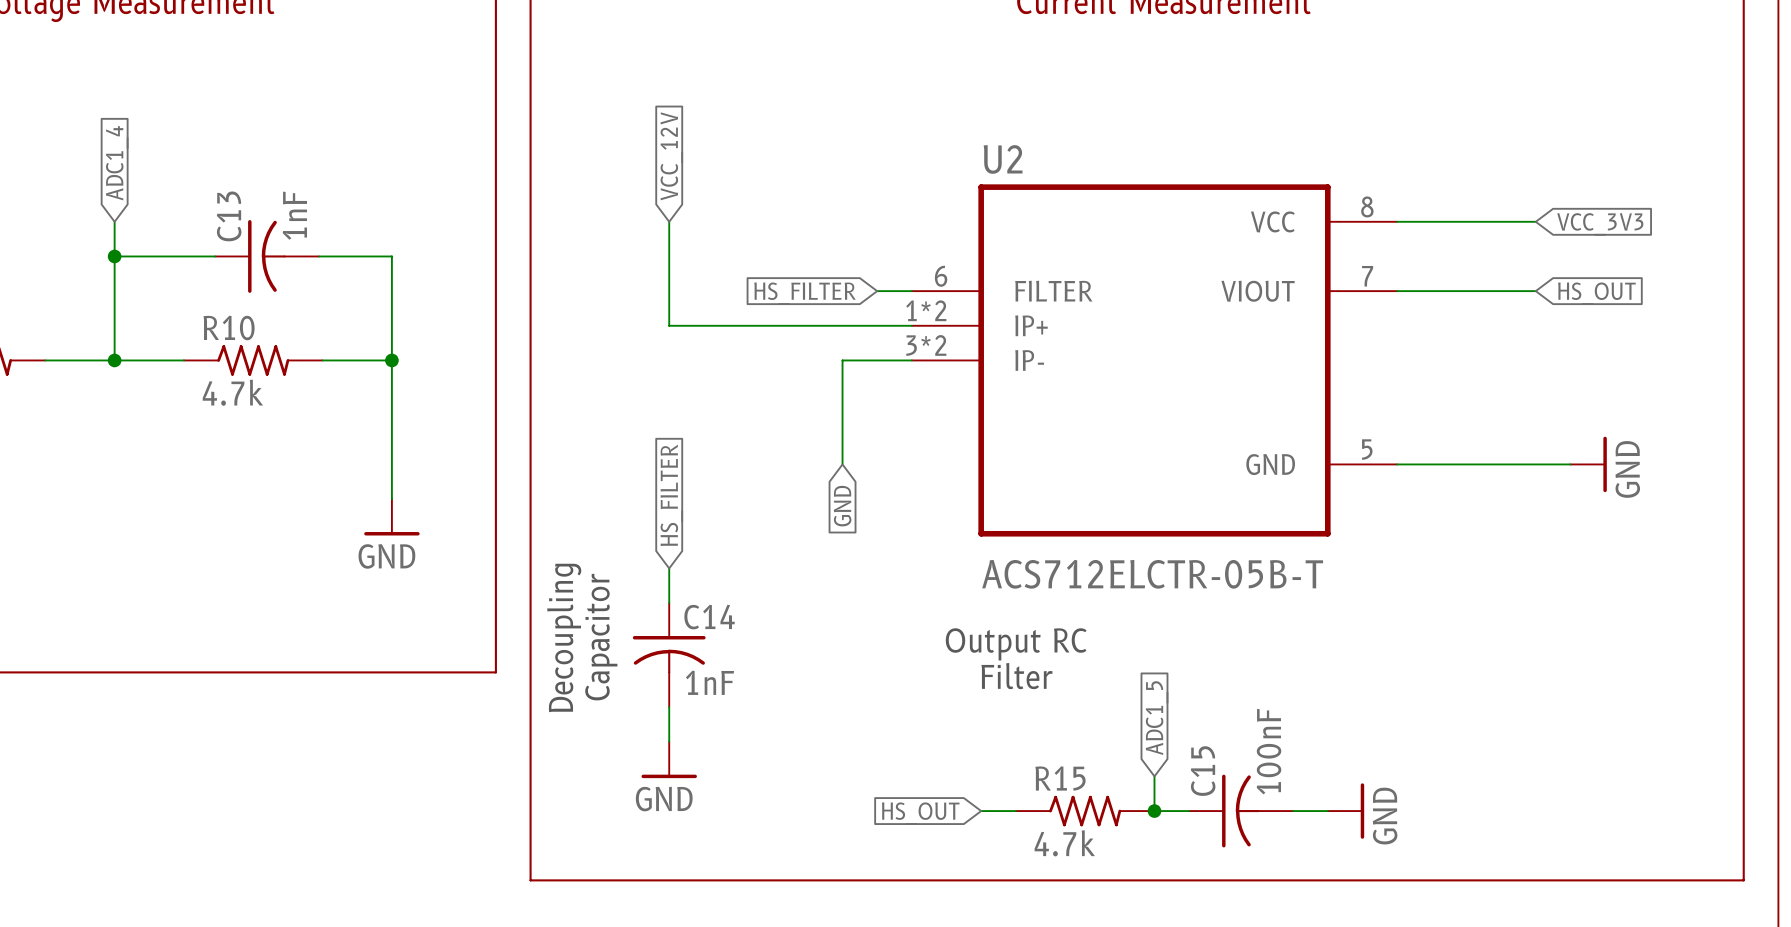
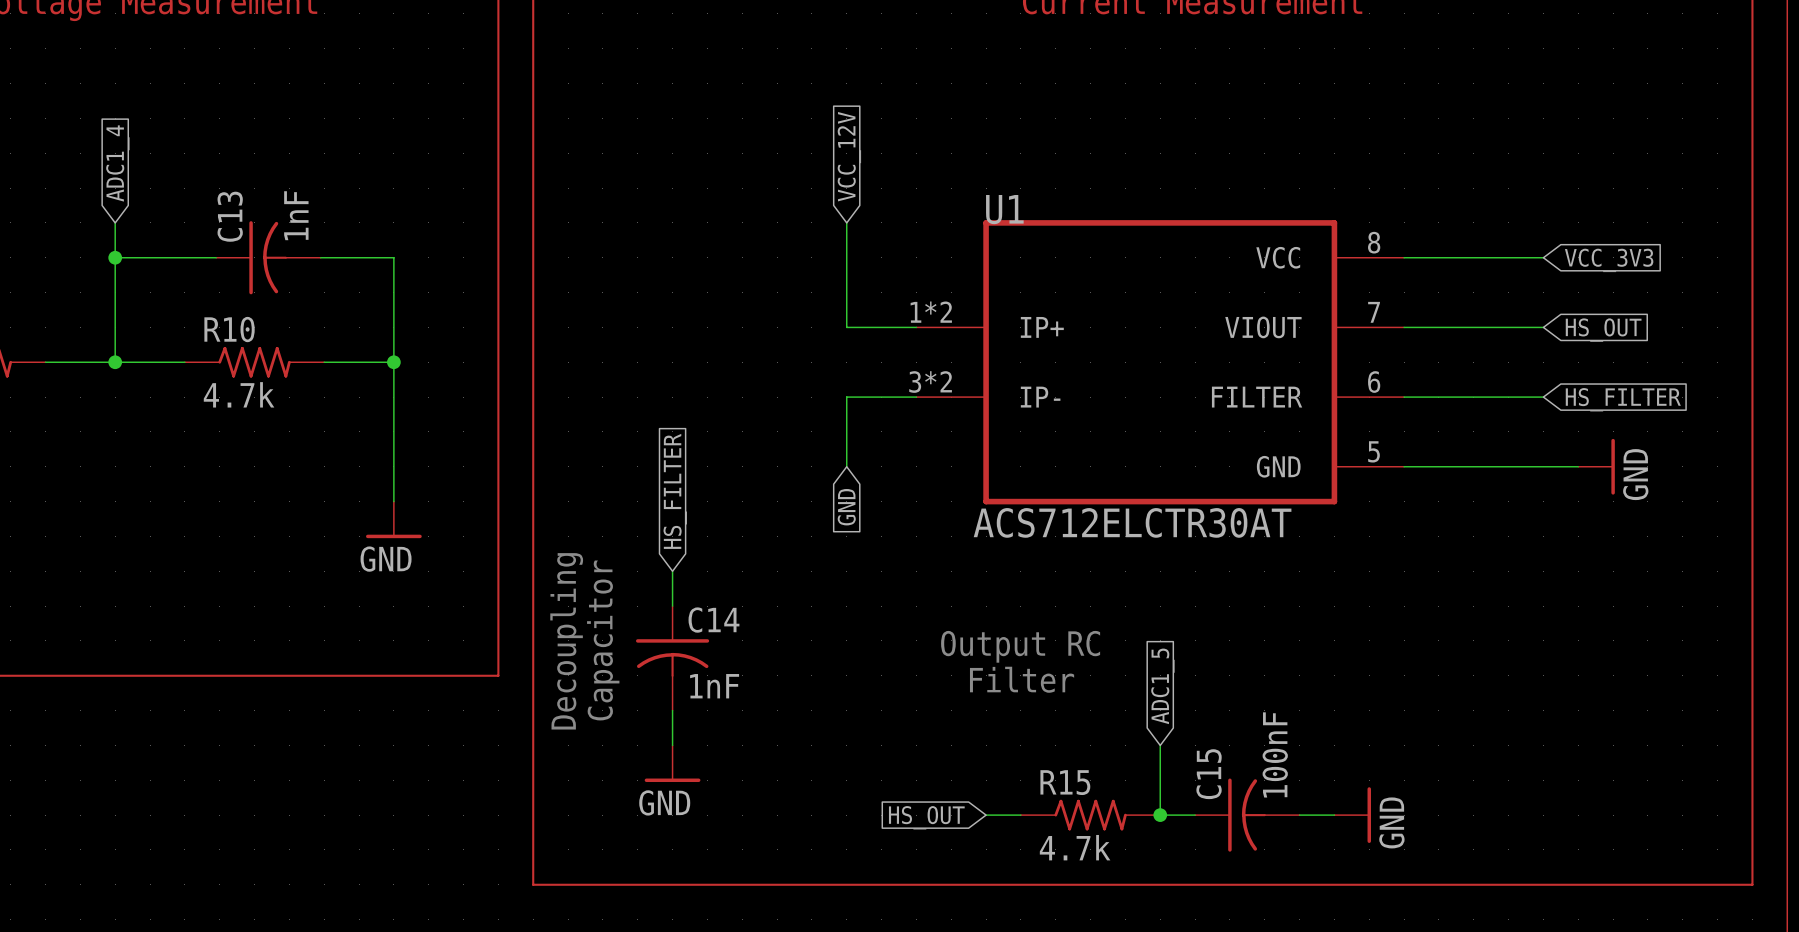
global label position: VCC_12V (671, 156) -> VCC_12V (849, 156)
wire: (669, 221) (669, 325) (842, 325) -> (846, 222) (846, 327)
wire: (1397, 221) (1535, 221) -> (1404, 257) (1543, 257)
global label position: VCC_3V3 (1600, 224) -> VCC_3V3 (1609, 260)
wire: (877, 291) (911, 291) -> none
wire: (1397, 291) (1535, 291) -> (1404, 327) (1543, 327)
global label: HS_FILTER (805, 293) -> none
global label position: HS_OUT (1596, 293) -> HS_OUT (1603, 330)
wire: (911, 360) (842, 360) (842, 395) -> (916, 397) (846, 397)
U2: ACS712ELCTR-05B-T (1154, 360) -> none
U1: none -> ACS712ELCTR30AT (1160, 362)
wire: none -> (1404, 397) (1543, 397)
global label: none -> HS_FILTER (1623, 399)
global label position: ADC1_5 (1157, 718) -> ADC1_5 (1162, 686)
wire: none -> (1160, 745) (1160, 780)

